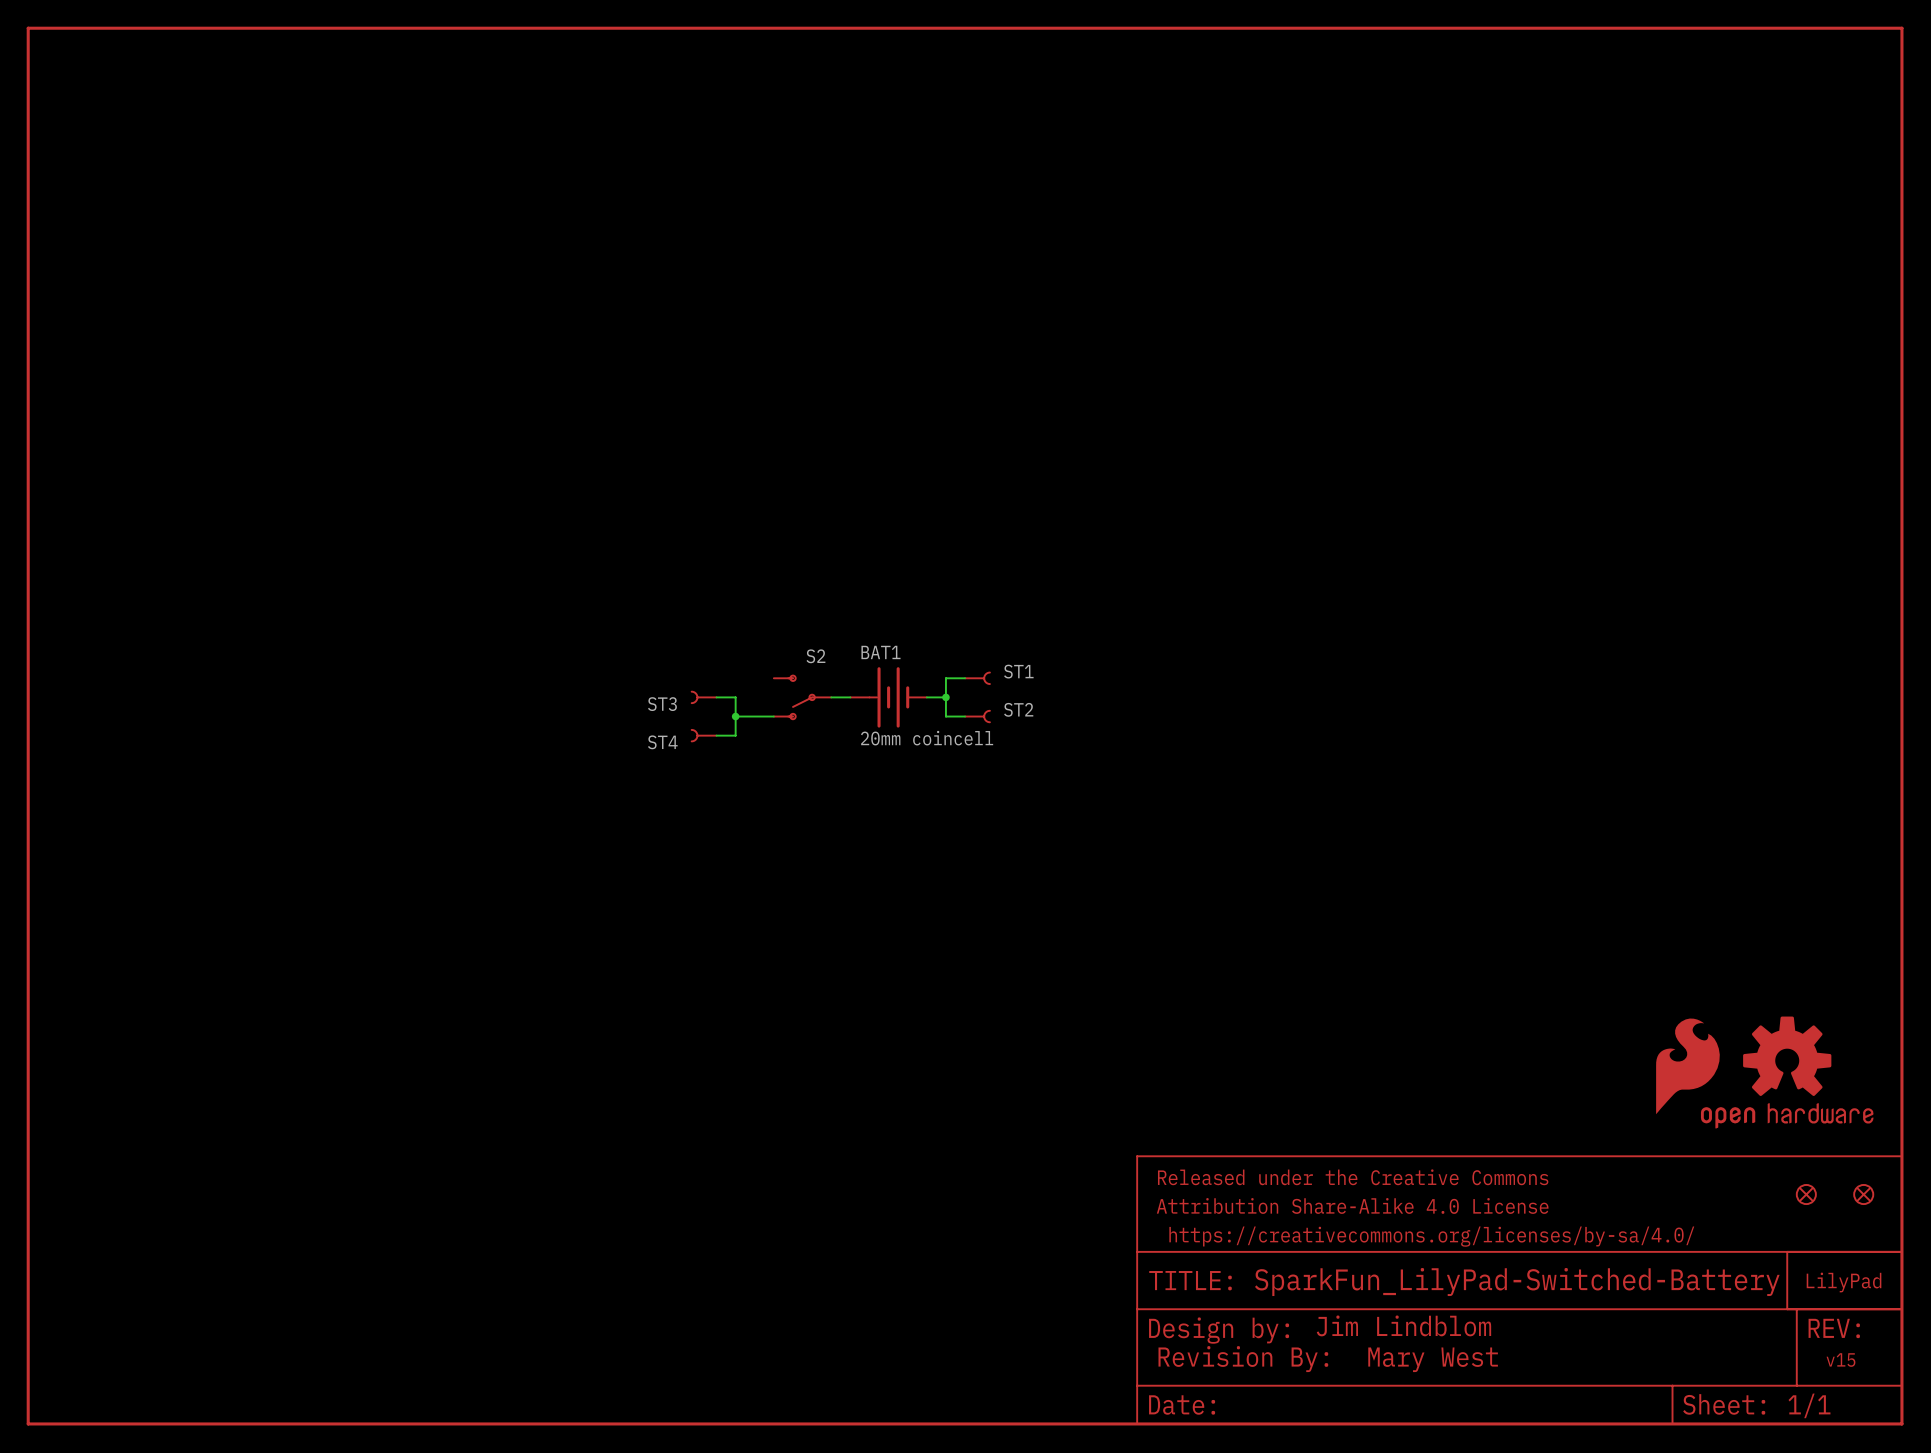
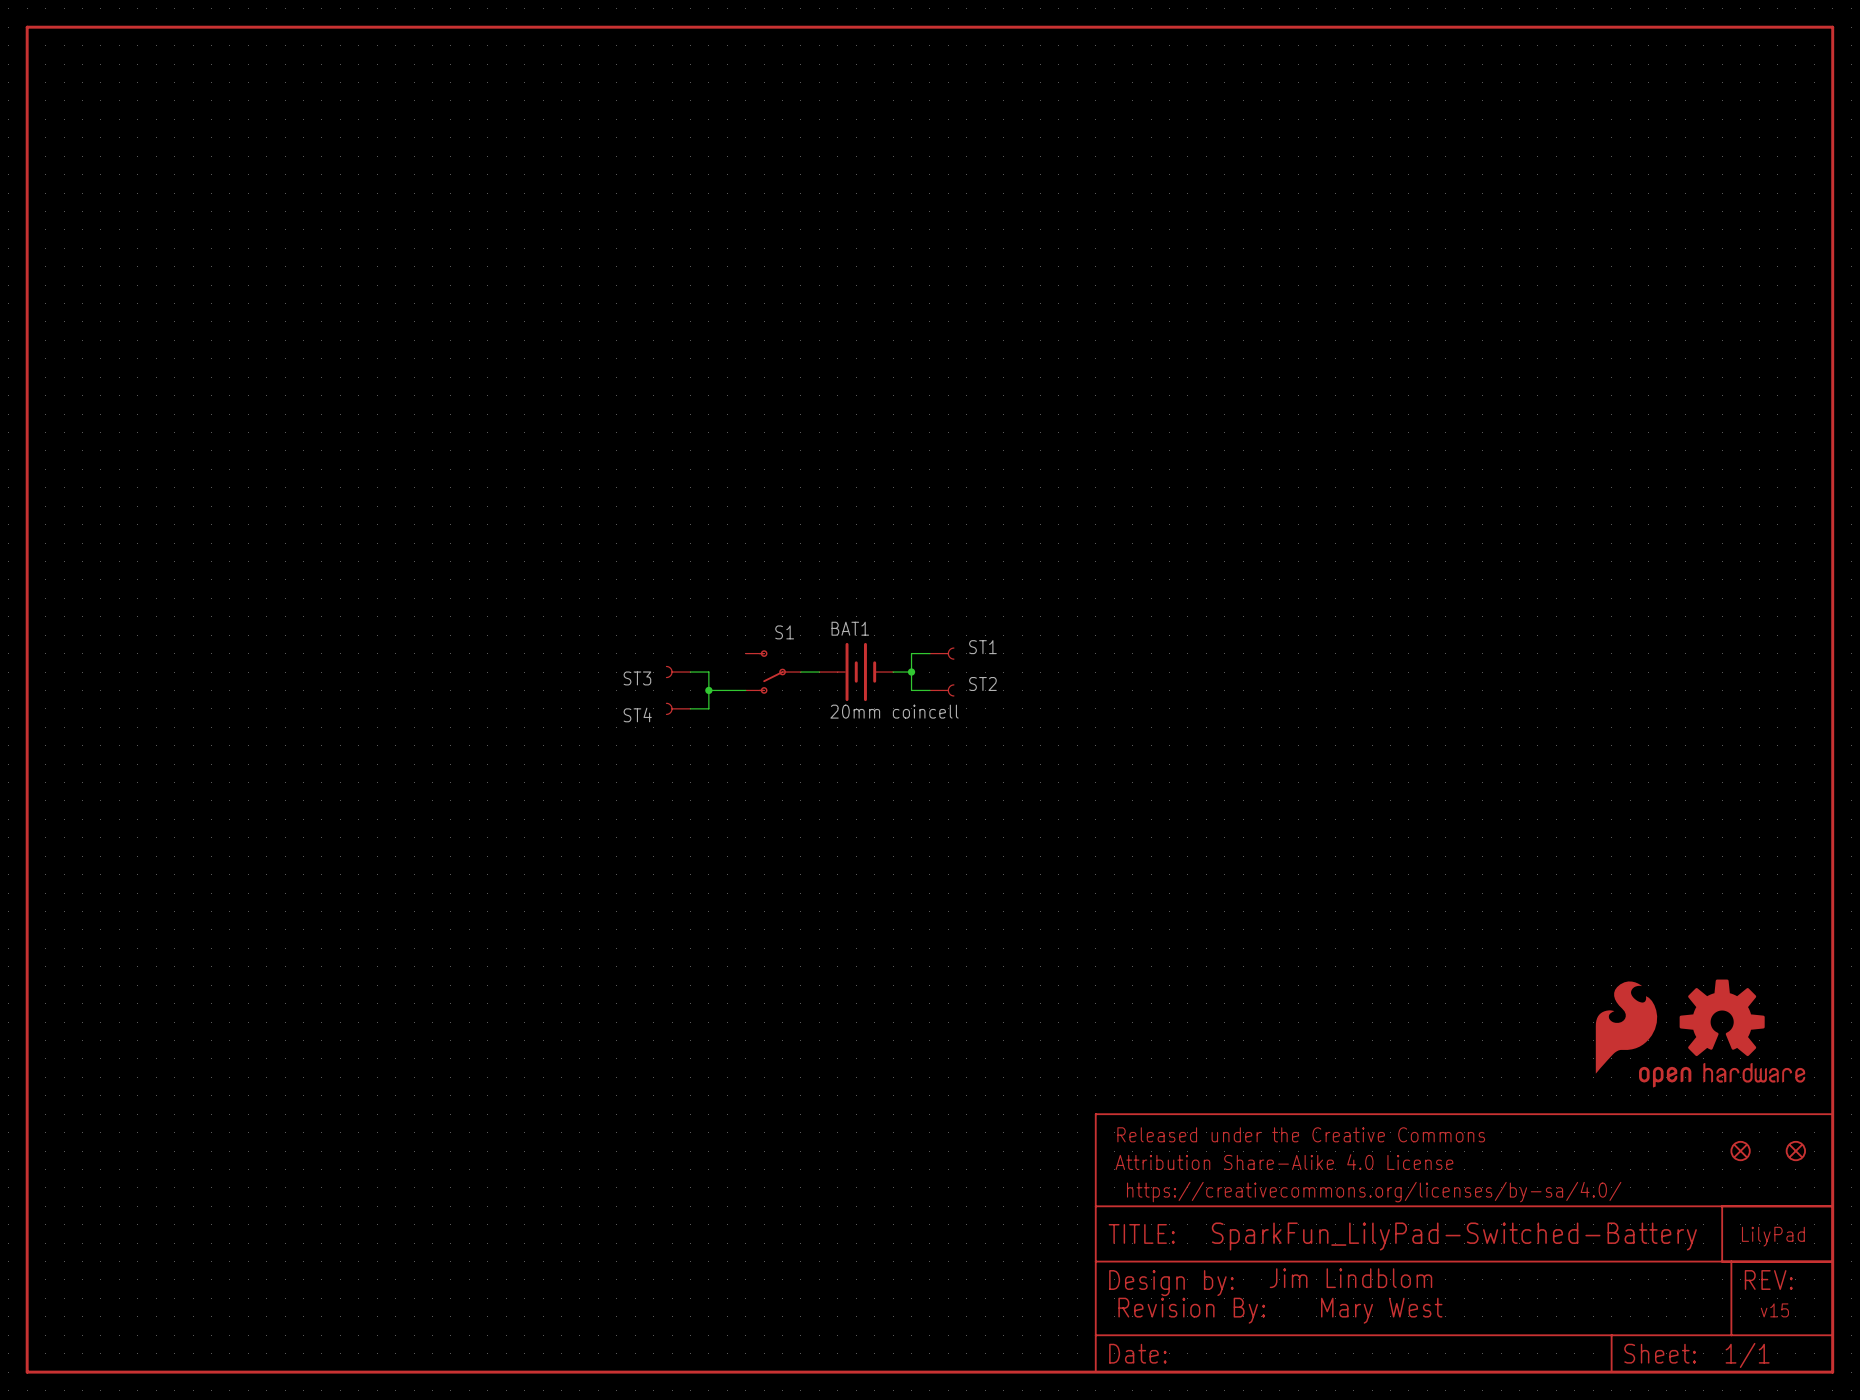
S2 name: S2 (815, 656) -> S1 (784, 632)

